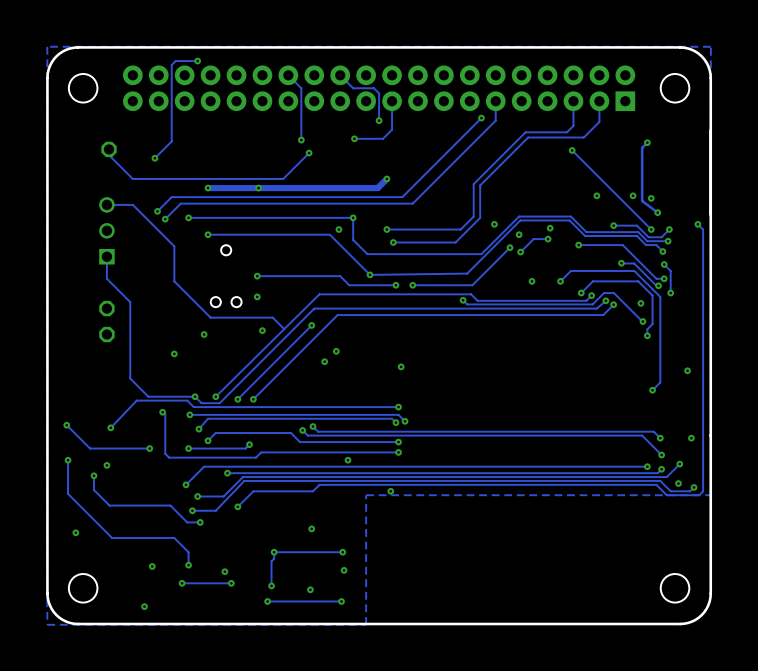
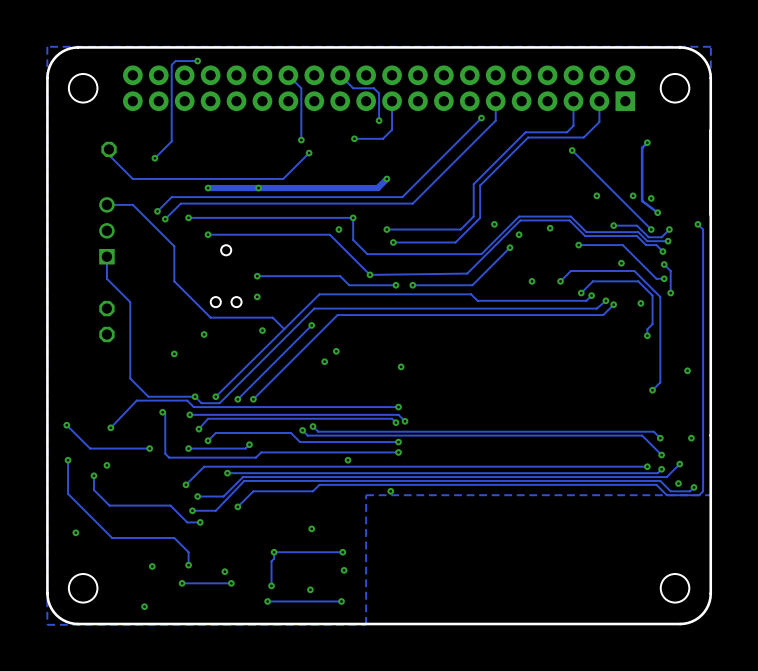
track: (548, 239) (533, 239) (520, 252) -> none
via: (548, 239) -> none
via: (520, 252) -> none
track: (621, 263) (634, 263) (658, 285) -> none
via: (658, 285) -> none
track: (463, 300) (467, 304) (592, 304) (604, 293) (613, 293) (642, 321) -> none
via: (463, 300) -> none
via: (642, 321) -> none

